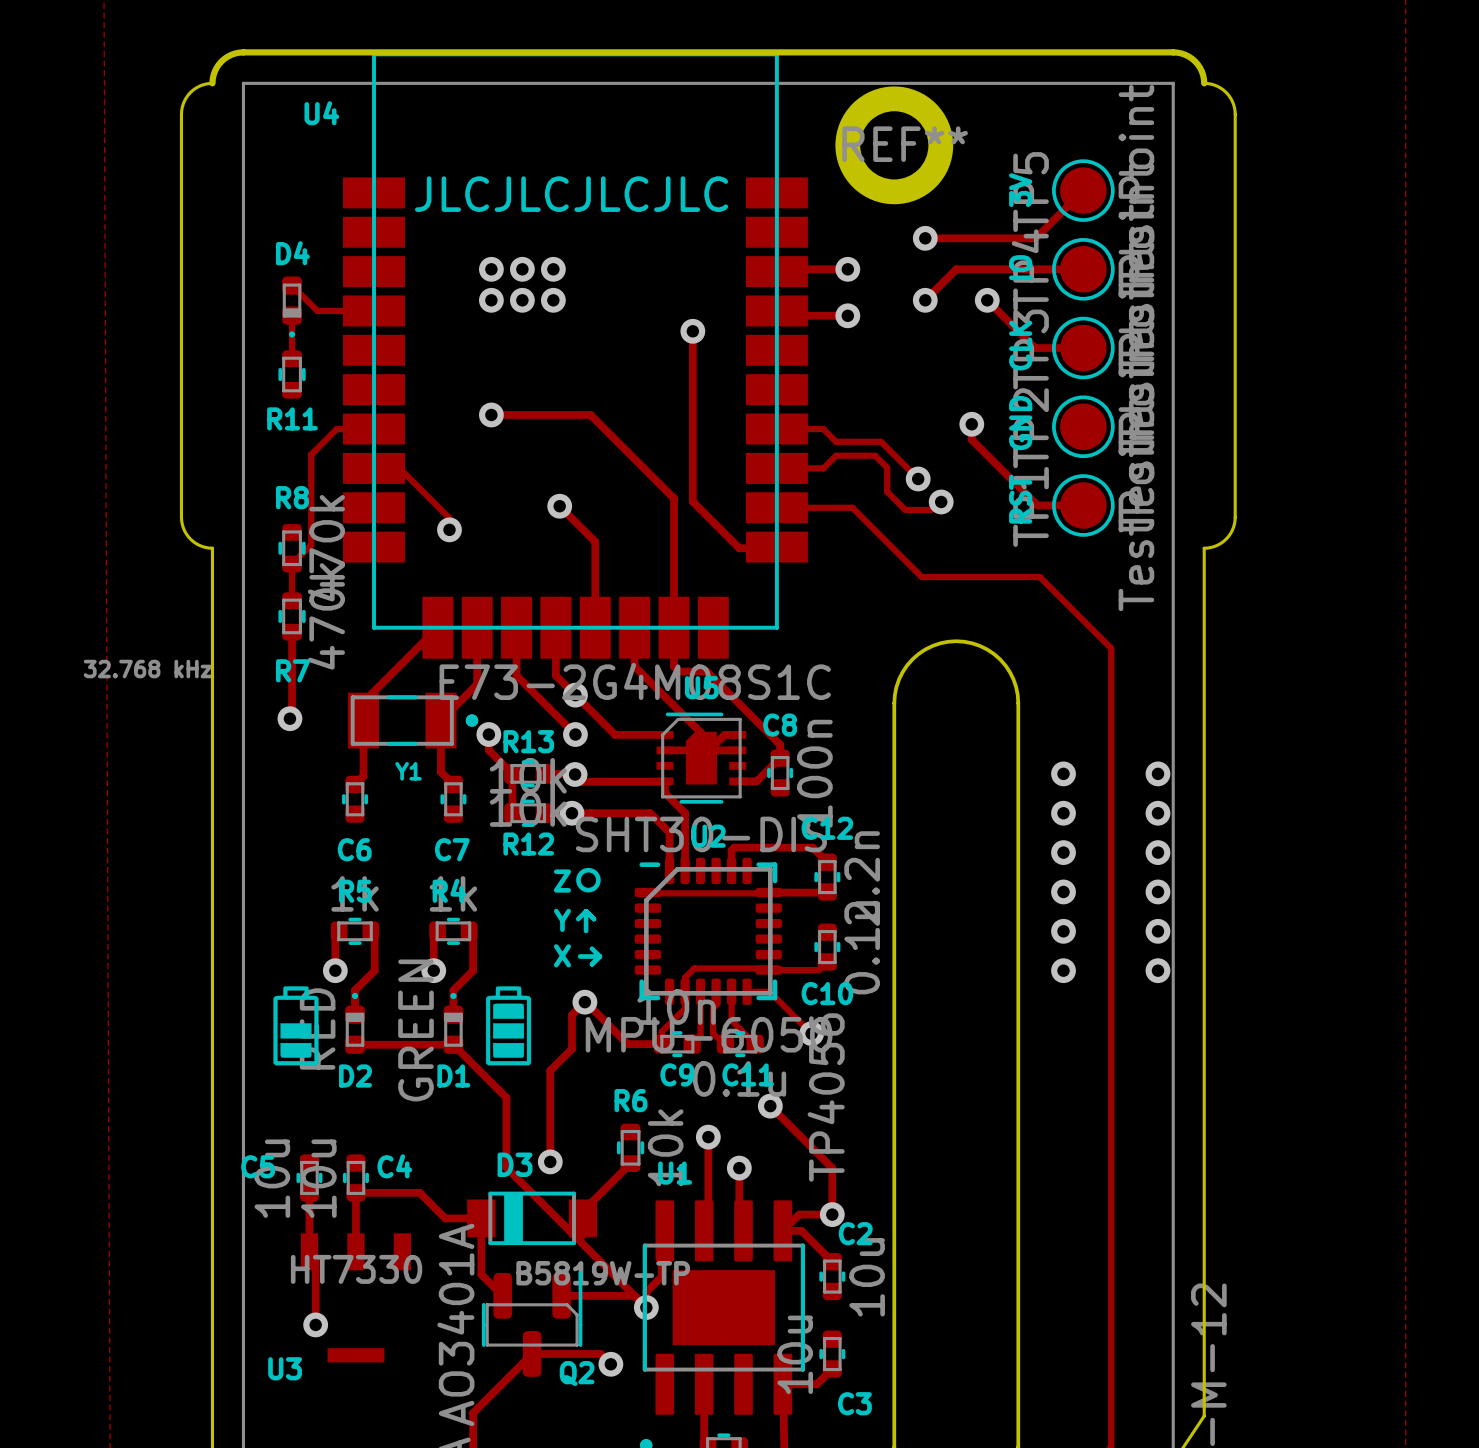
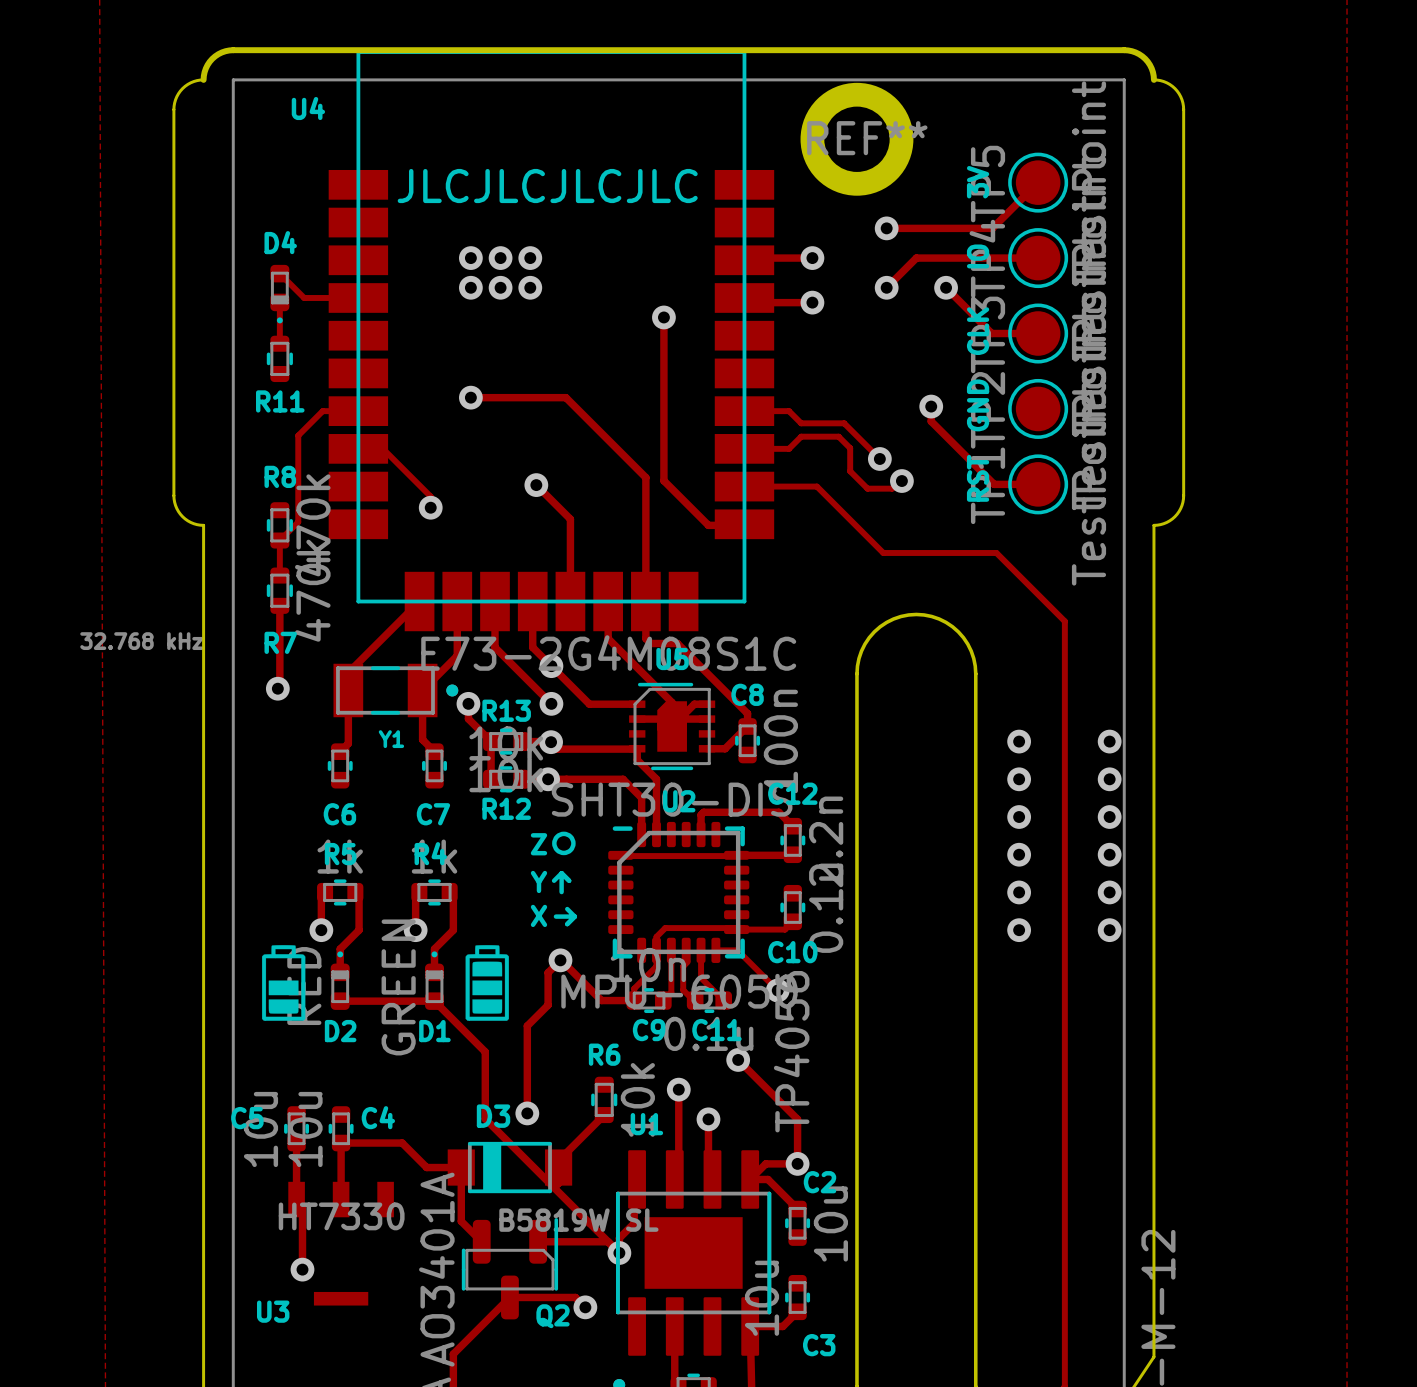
D3 value: B5819W-TP (603, 1273) -> B5819W SL (578, 1220)

